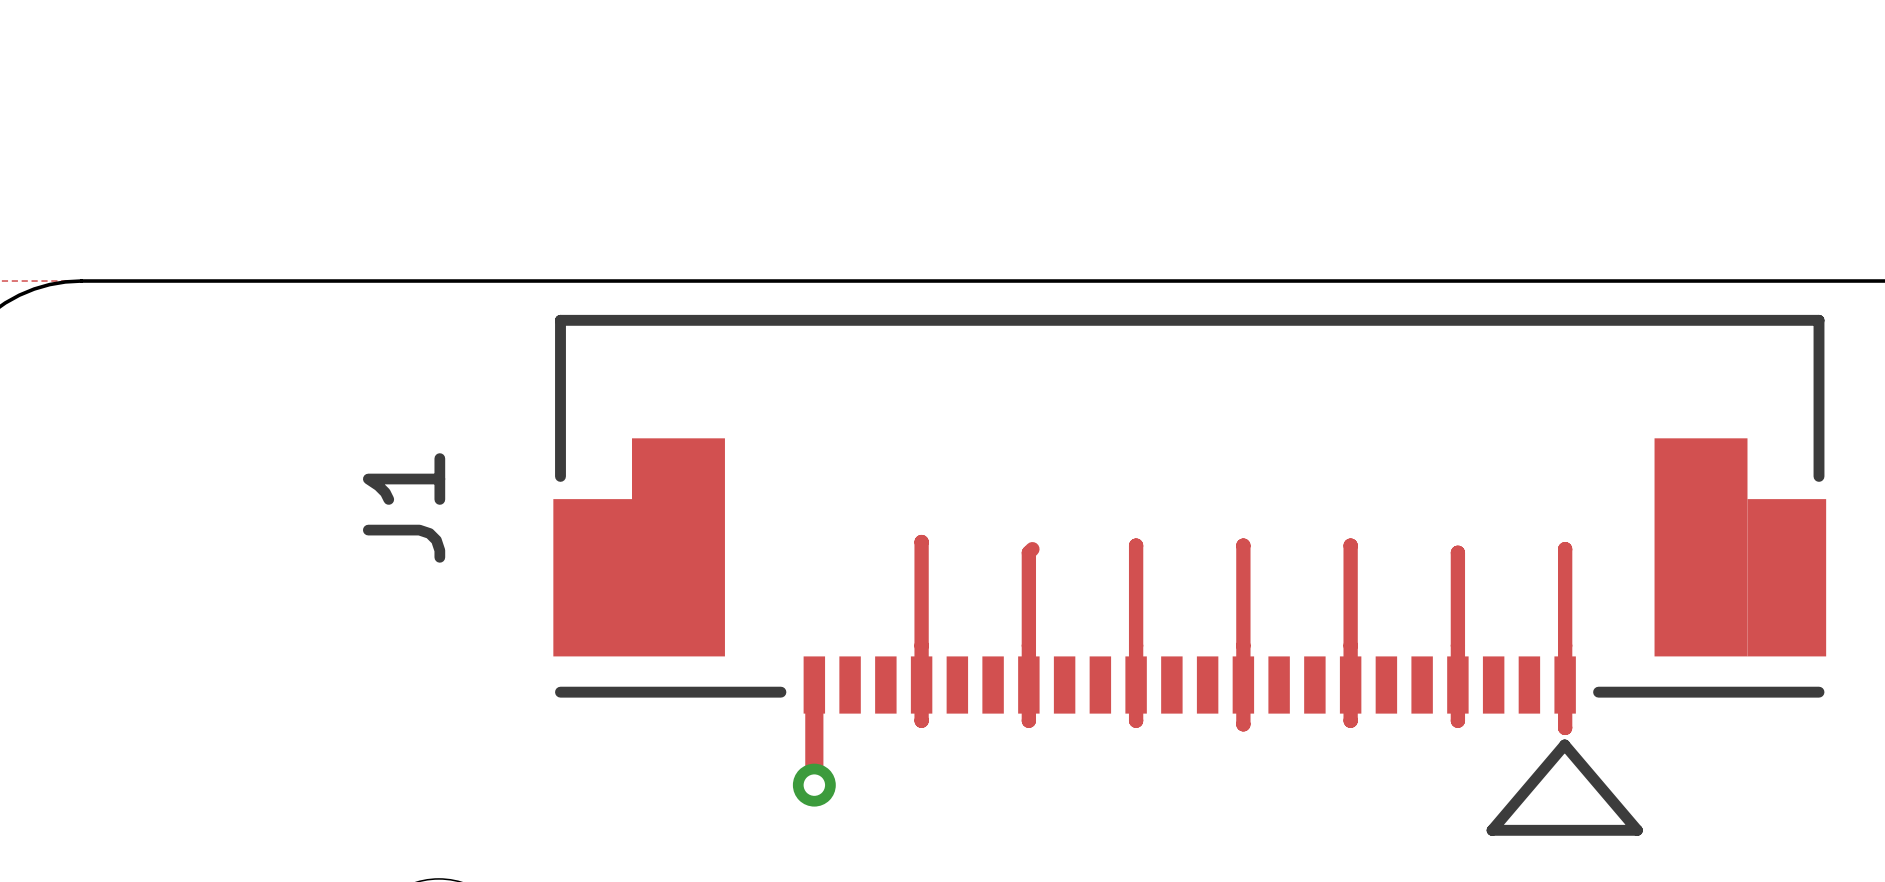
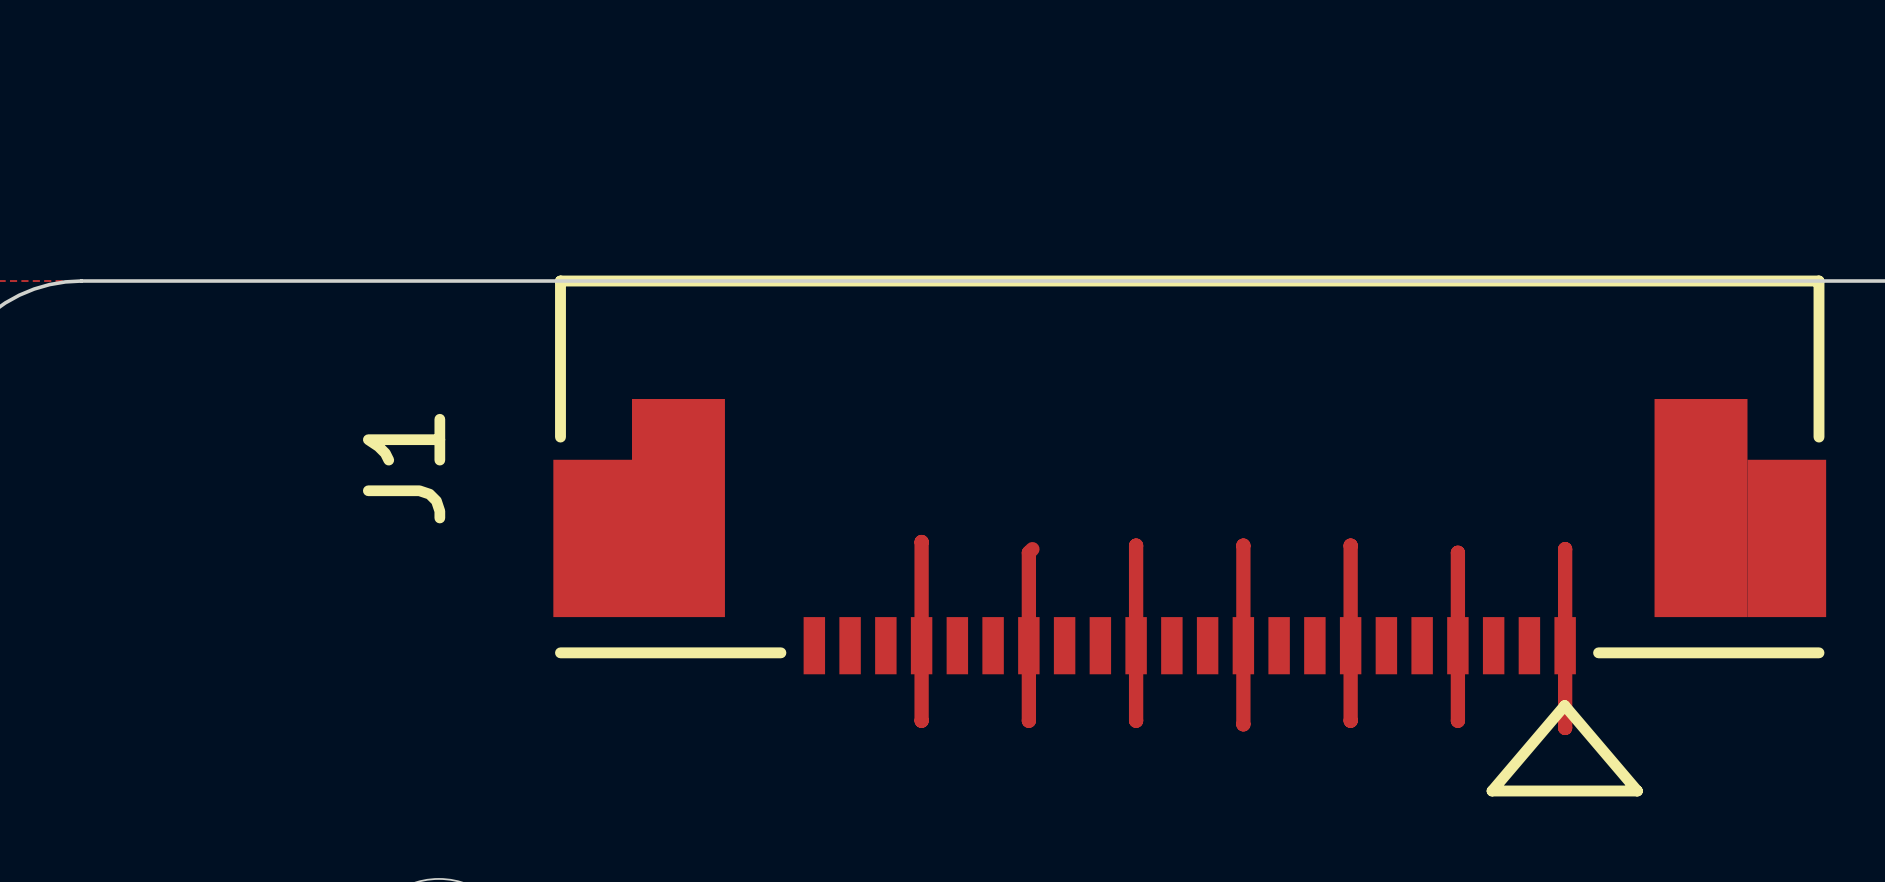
J1 position: (1189, 575) -> (1189, 536)
track: (814, 685) (814, 785) -> none
via: (814, 785) -> none

